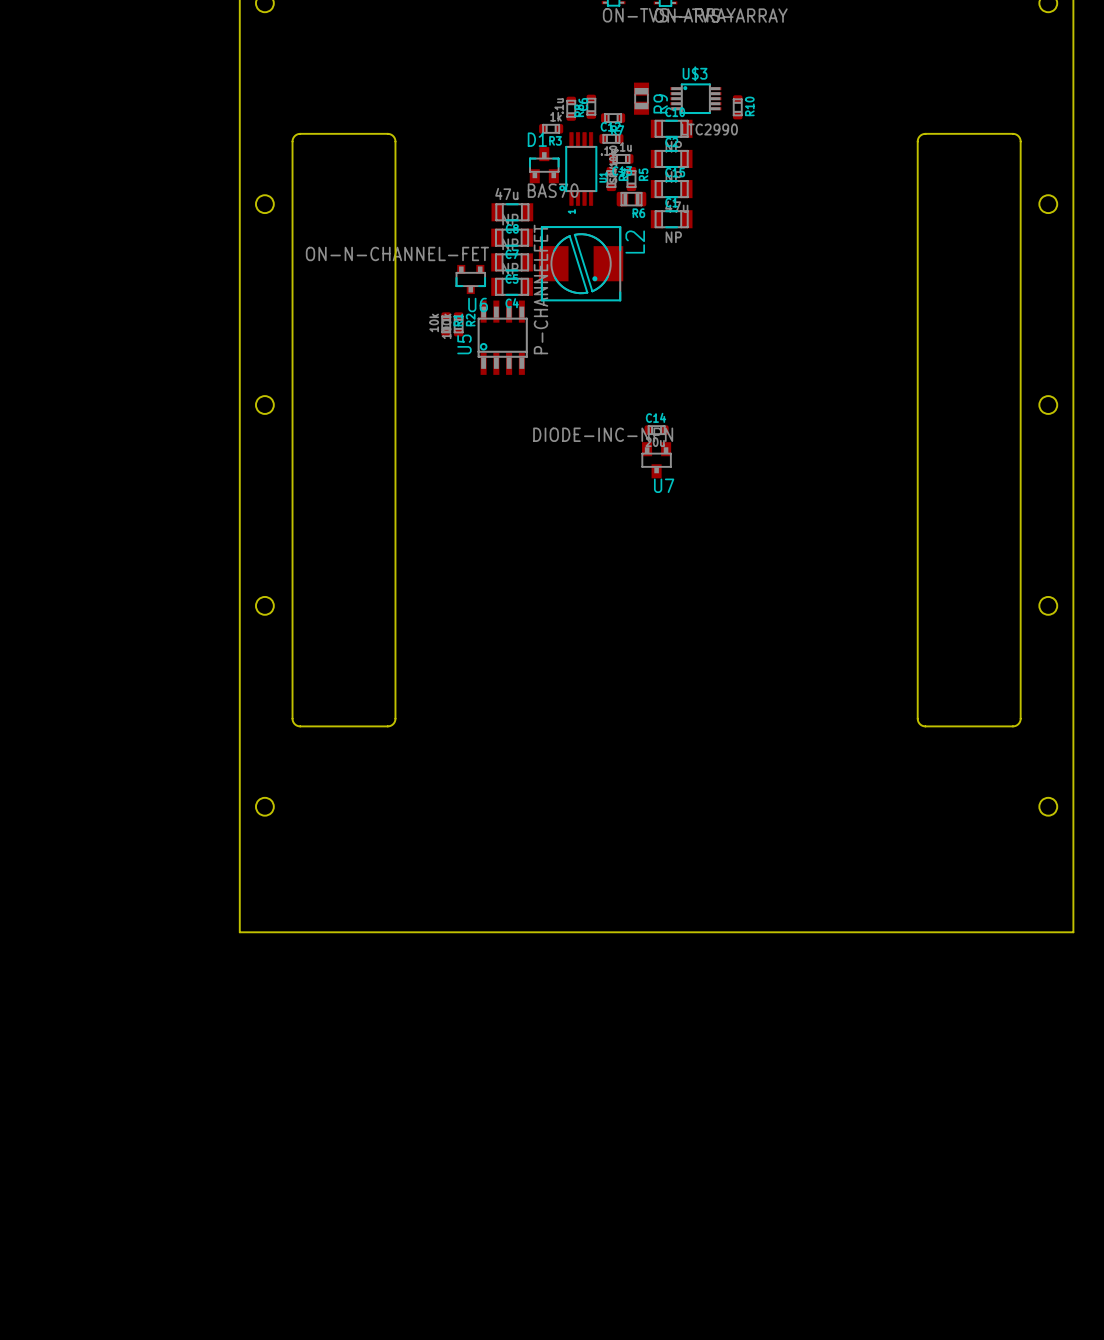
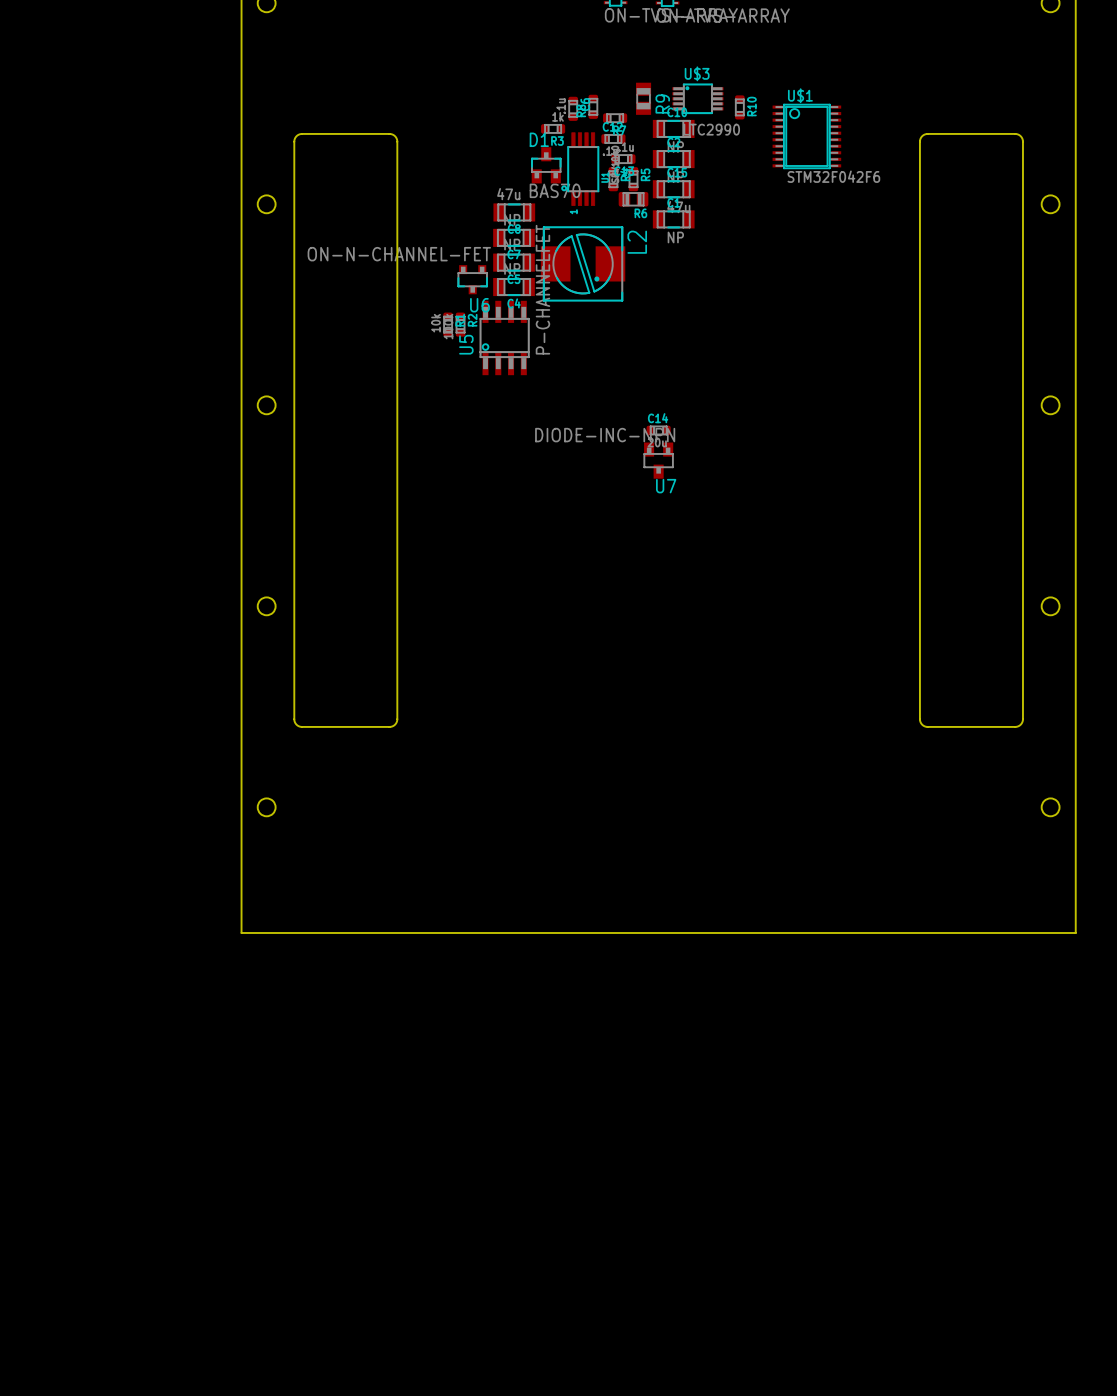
U$1: none -> STM32F042F6 (806, 136)

